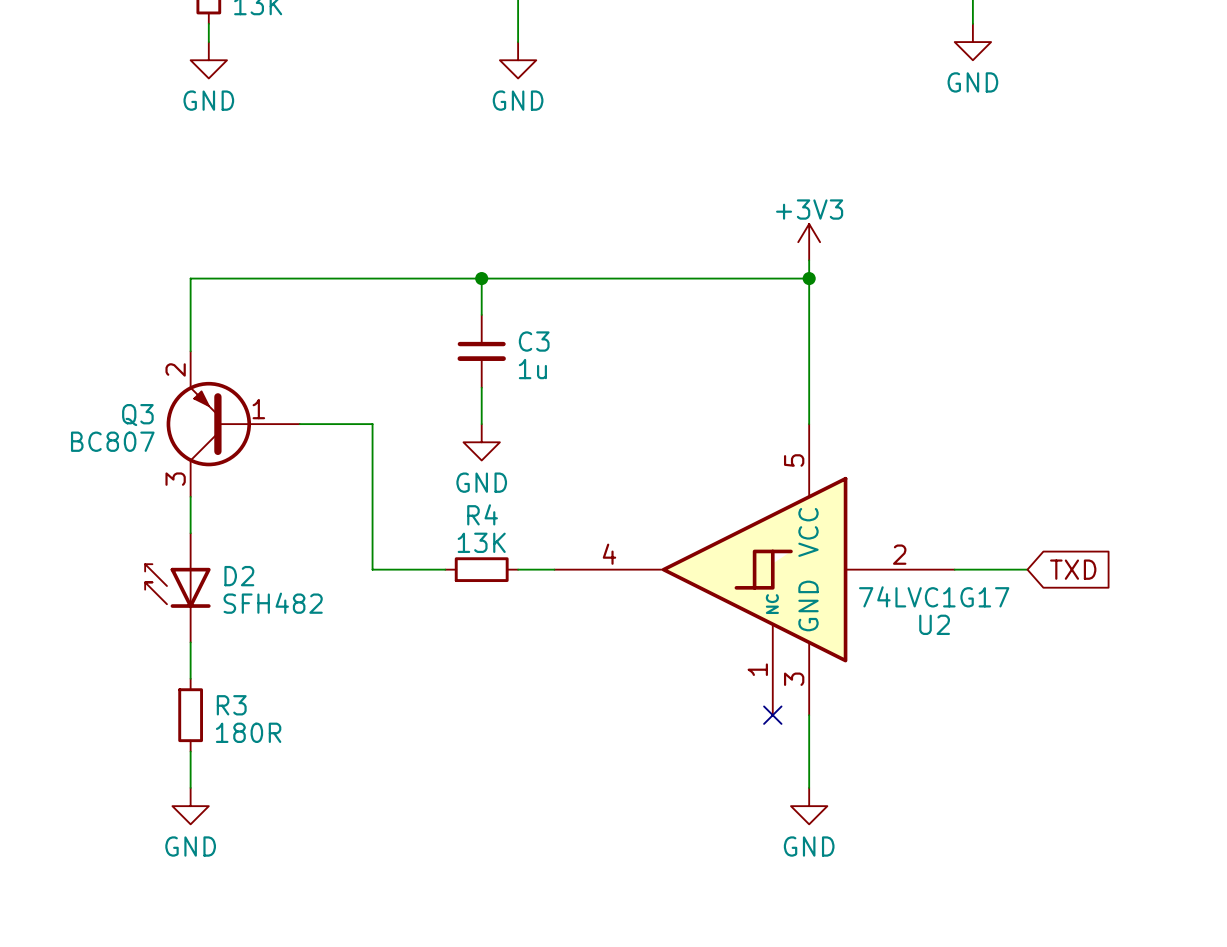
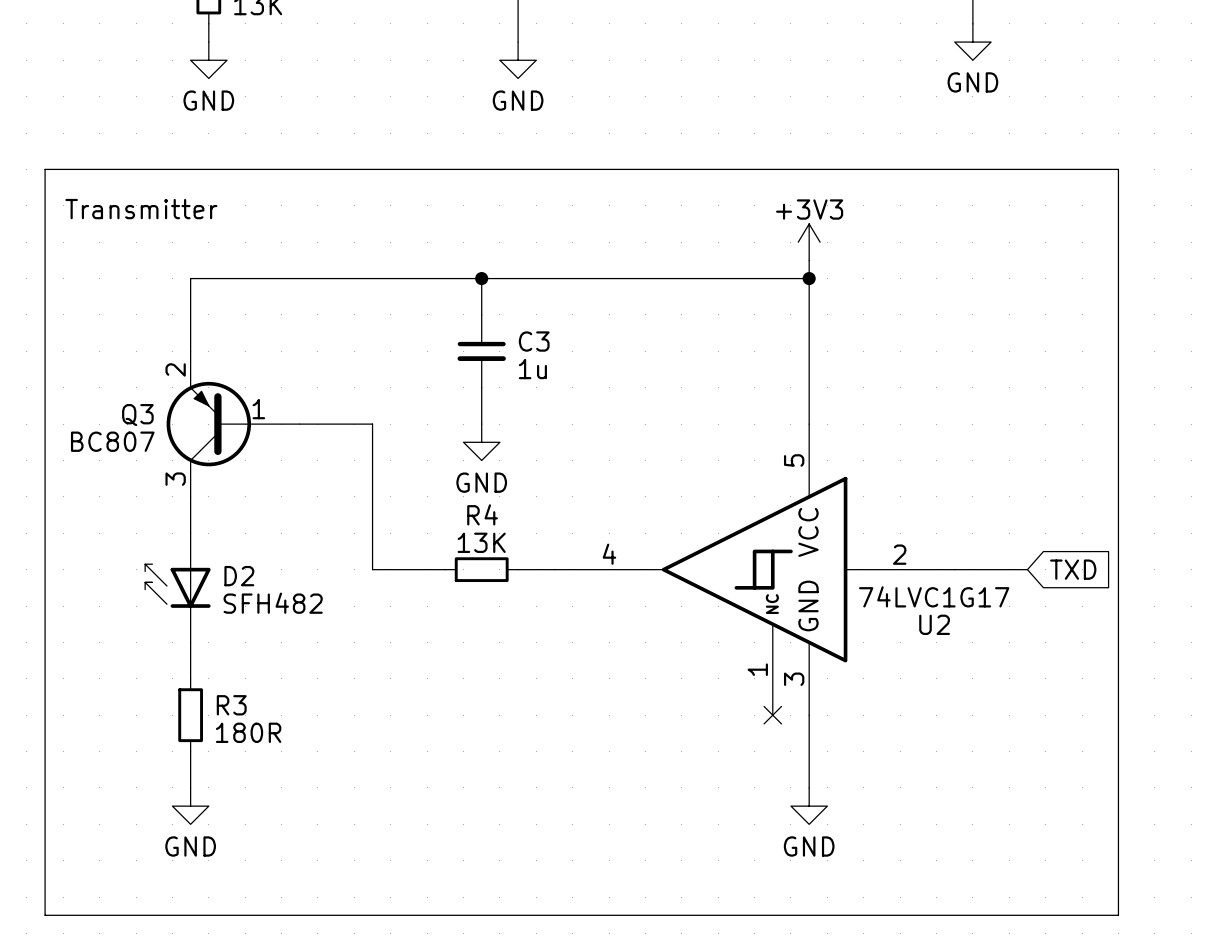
line: none -> (45, 169) (1118, 169) (1118, 915) (45, 915) (45, 169)
text: none -> Transmitter (141, 209)

